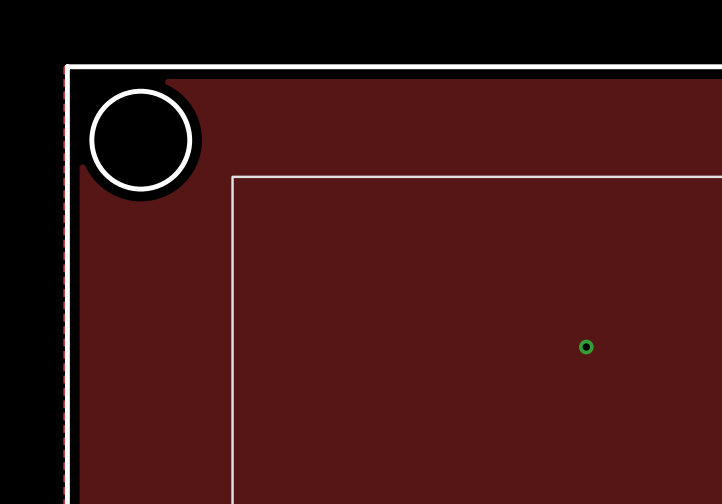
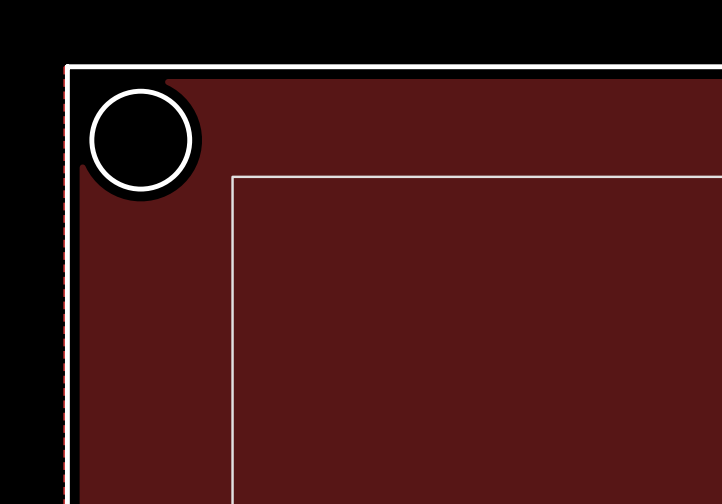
via: (586, 347) -> none

